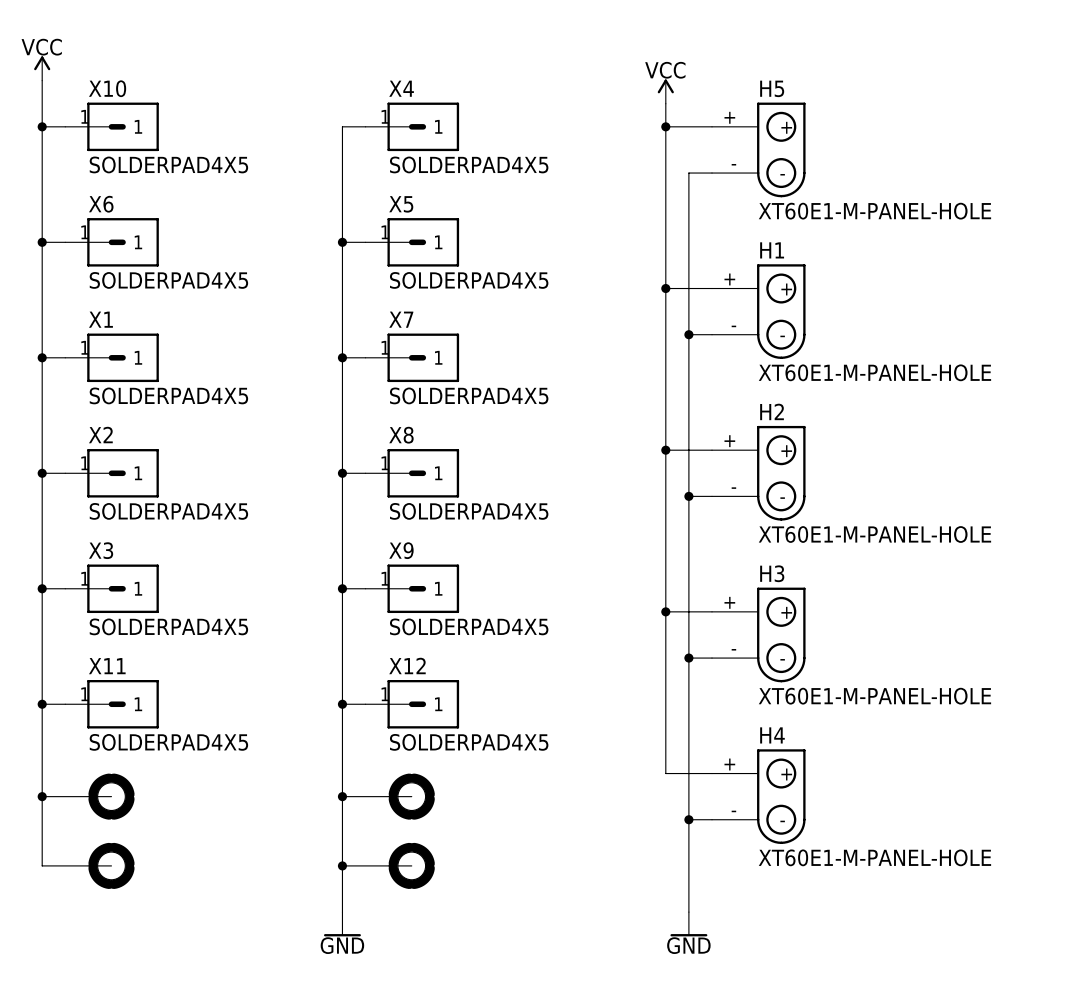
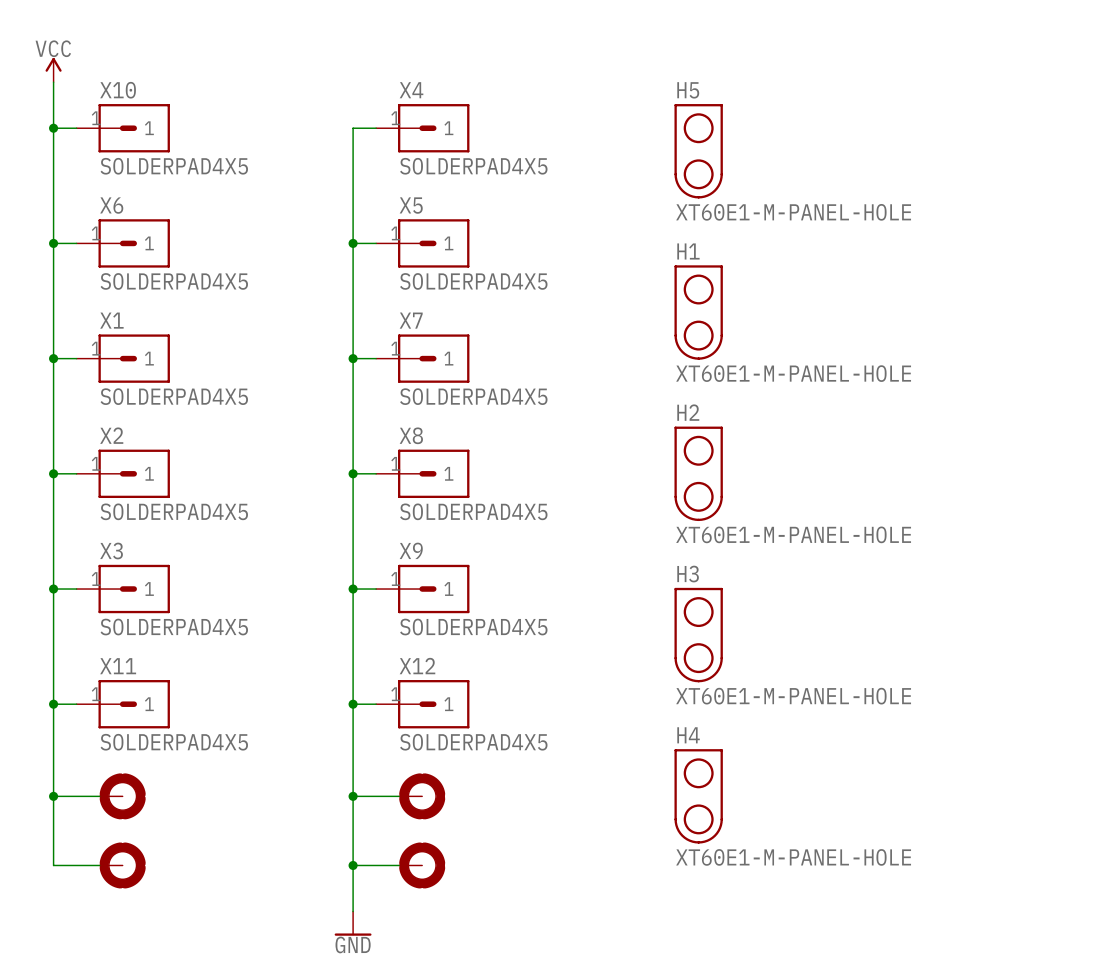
H5 name position: H5 (772, 88) -> H5 (688, 90)
power symbol: VCC (665, 91) -> none
H5 symbol: [712, 102, 806, 198] -> [674, 104, 723, 199]
wire: (665, 103) (665, 773) (712, 773) -> none
wire: (665, 126) (712, 126) -> none
junction: (665, 126) -> none
wire: (712, 173) (688, 173) (688, 912) -> none
H5 value position: XT60E1-M-PANEL-HOLE (874, 211) -> XT60E1-M-PANEL-HOLE (793, 212)
H1 name position: H1 (772, 250) -> H1 (688, 251)
H1 symbol: [712, 264, 806, 359] -> [674, 265, 723, 360]
wire: (665, 288) (712, 288) -> none
junction: (665, 288) -> none
wire: (688, 334) (712, 334) -> none
junction: (688, 334) -> none
H1 value position: XT60E1-M-PANEL-HOLE (874, 372) -> XT60E1-M-PANEL-HOLE (793, 373)
H2 name position: H2 (772, 411) -> H2 (688, 412)
H2 symbol: [712, 425, 806, 521] -> [674, 426, 723, 522]
wire: (665, 450) (712, 450) -> none
junction: (665, 450) -> none
wire: (688, 496) (712, 496) -> none
junction: (688, 496) -> none
H2 value position: XT60E1-M-PANEL-HOLE (874, 534) -> XT60E1-M-PANEL-HOLE (793, 534)
H3 name position: H3 (772, 573) -> H3 (688, 574)
H3 symbol: [712, 587, 806, 683] -> [674, 587, 723, 683]
wire: (665, 611) (712, 611) -> none
junction: (665, 611) -> none
wire: (688, 658) (712, 658) -> none
junction: (688, 658) -> none
H3 value position: XT60E1-M-PANEL-HOLE (874, 696) -> XT60E1-M-PANEL-HOLE (793, 696)
H4 name position: H4 (772, 735) -> H4 (688, 735)
H4 symbol: [712, 749, 806, 844] -> [674, 749, 723, 844]
wire: (688, 819) (712, 819) -> none
junction: (688, 819) -> none
H4 value position: XT60E1-M-PANEL-HOLE (874, 857) -> XT60E1-M-PANEL-HOLE (793, 857)
power symbol: GND (688, 924) -> none

